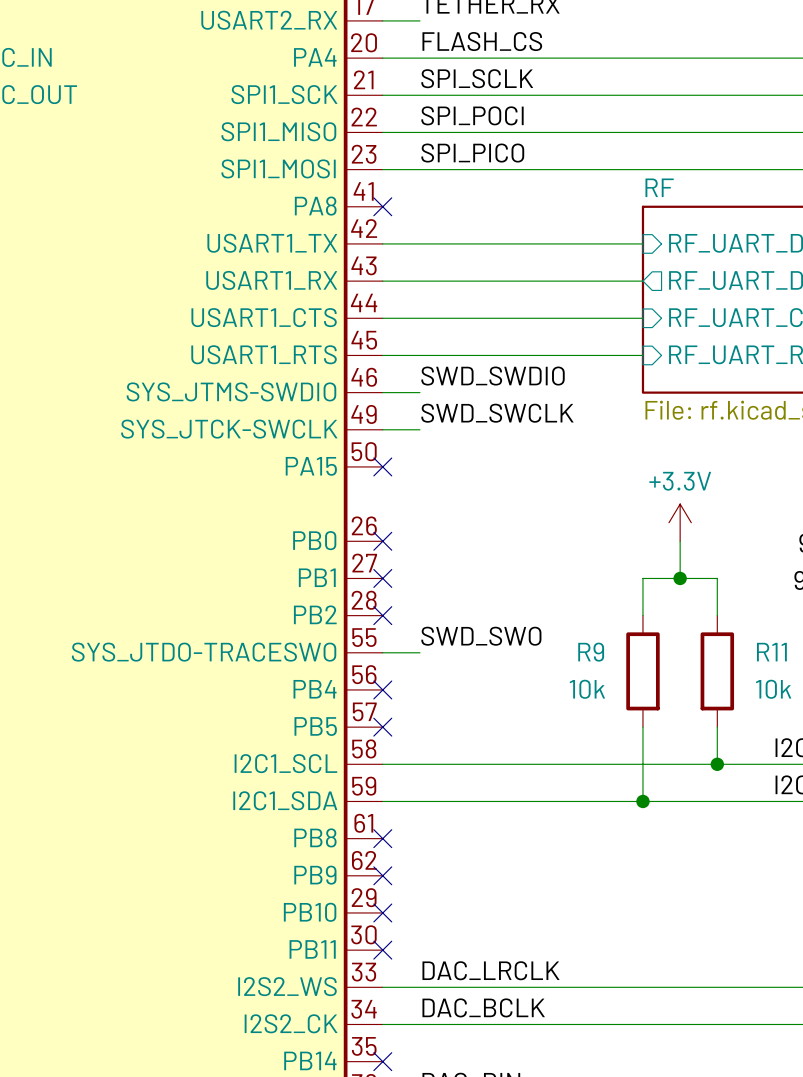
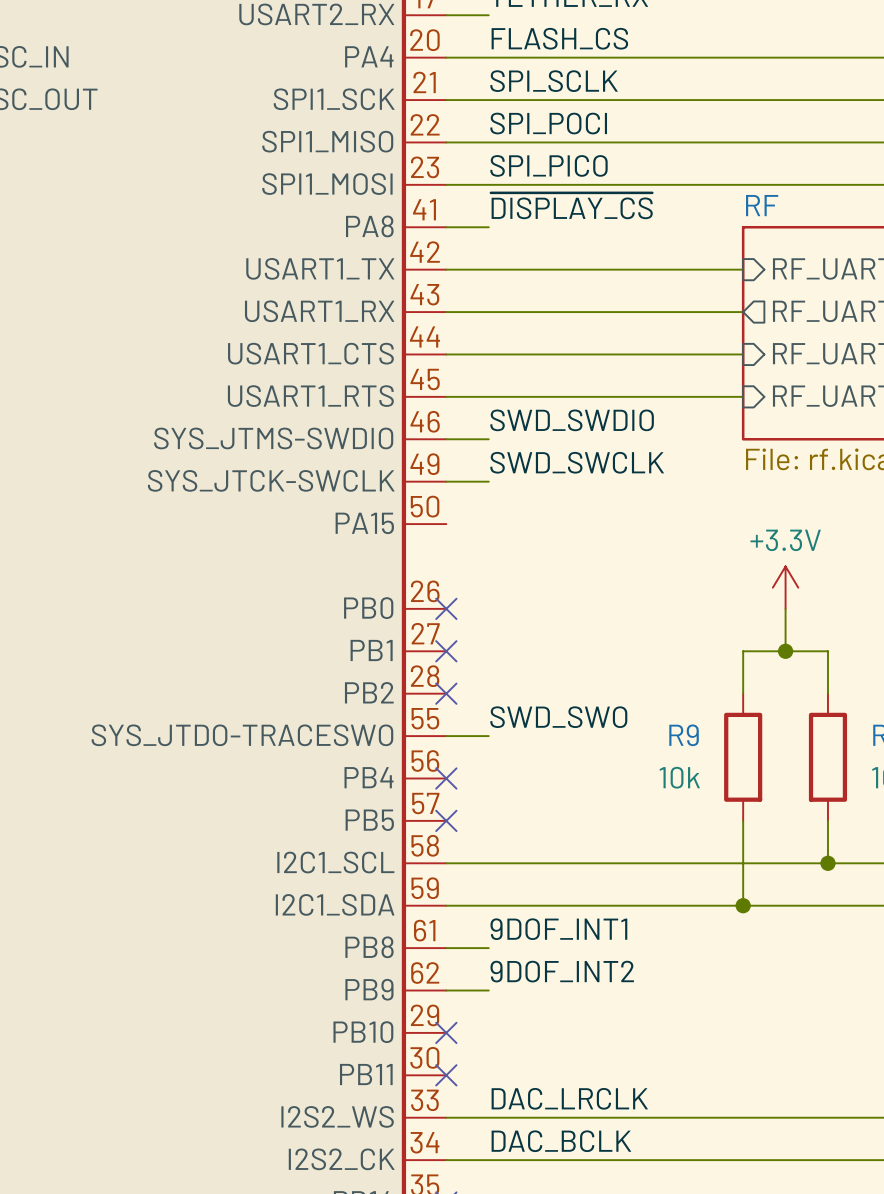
label: none -> ~{DISPLAY_CS} (571, 206)
wire: none -> (446, 227) (488, 227)
no-connect mark: (382, 206) -> none
no-connect mark: (382, 466) -> none
label: none -> 9DOF_INT1 (558, 929)
wire: none -> (446, 948) (488, 948)
no-connect mark: (382, 838) -> none
label: none -> 9DOF_INT2 (562, 971)
wire: none -> (446, 990) (488, 990)
no-connect mark: (382, 875) -> none

